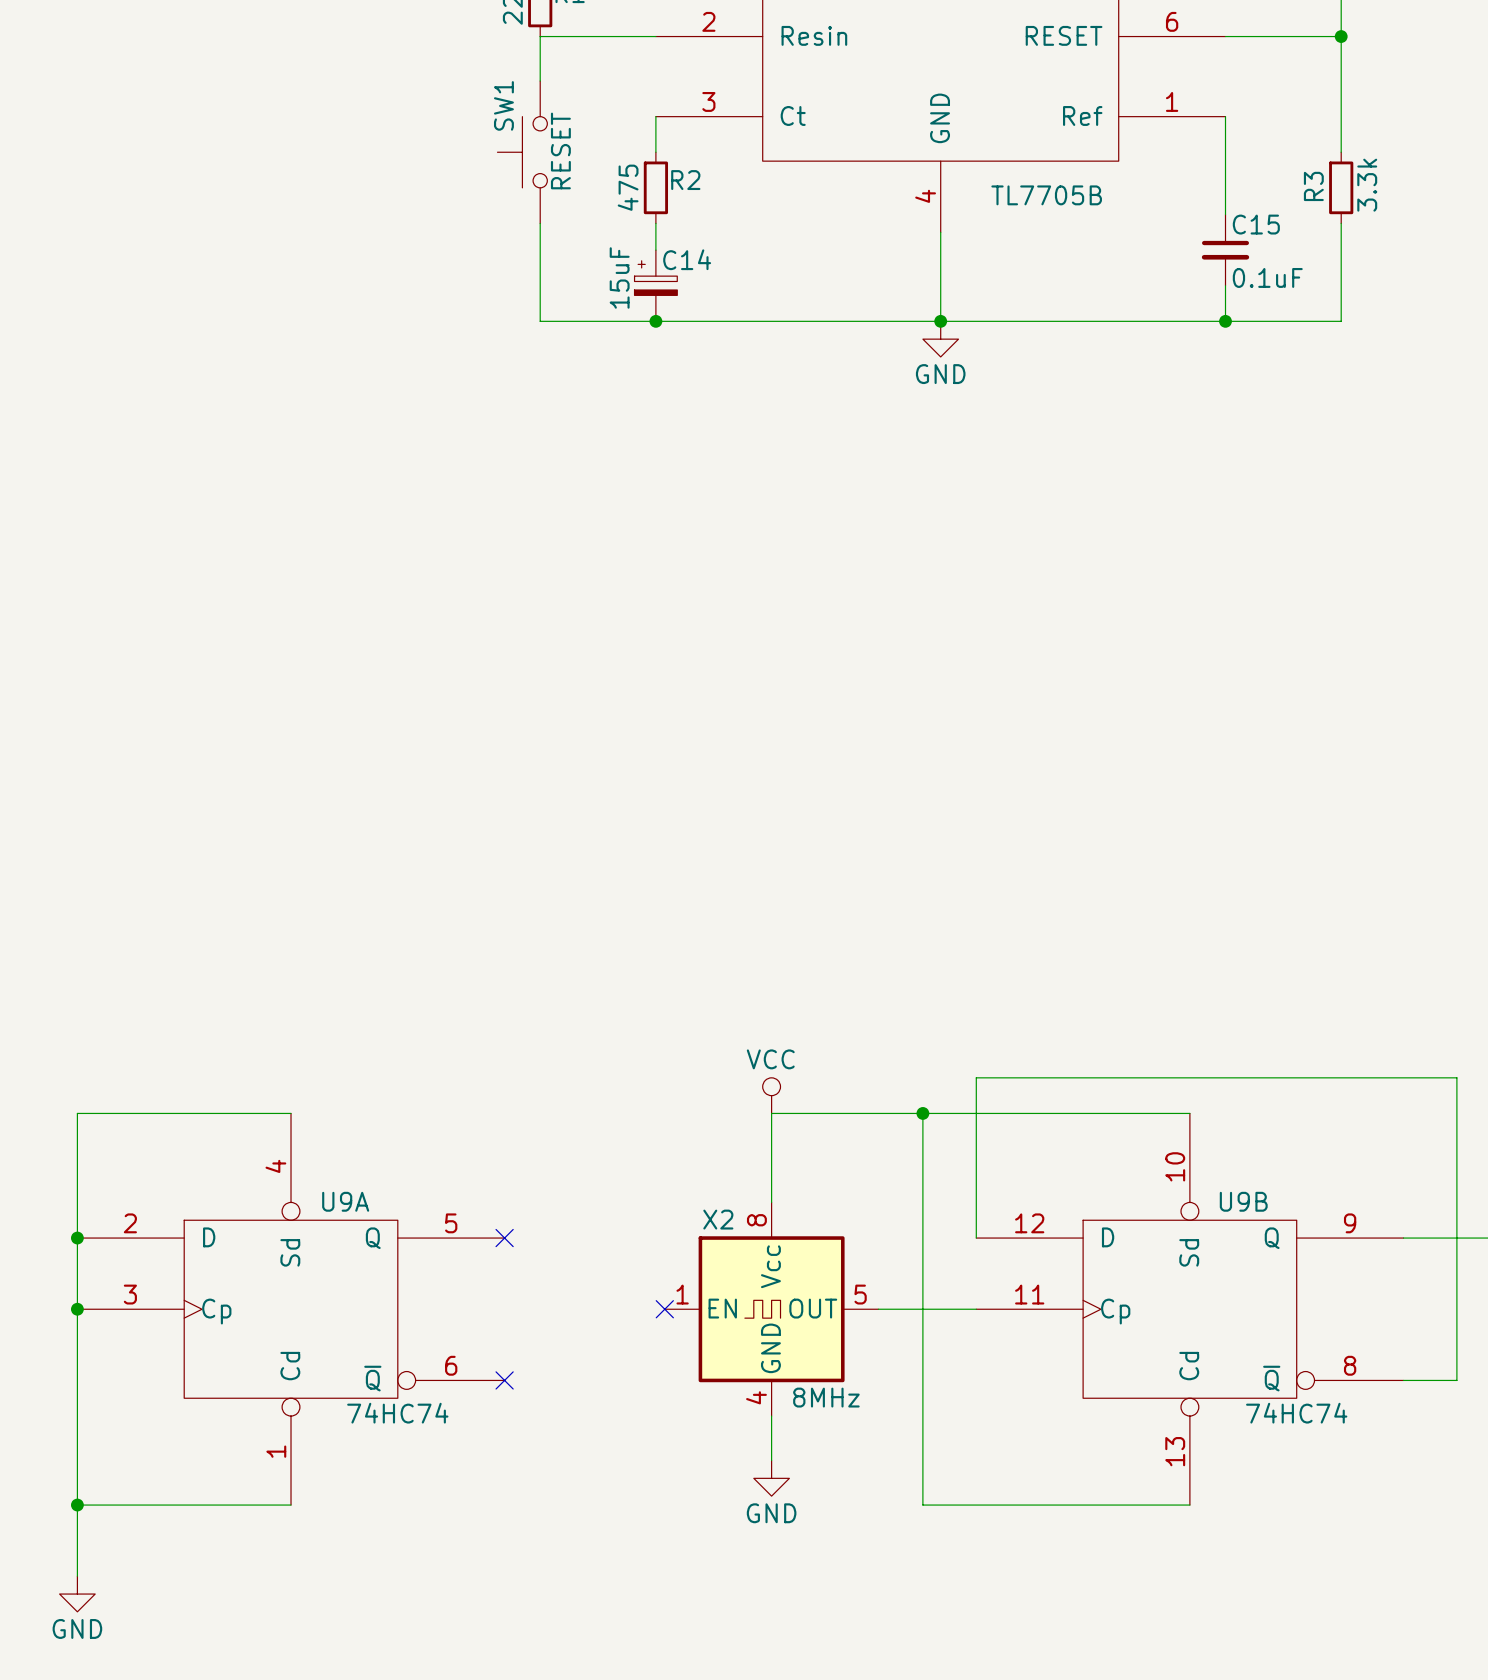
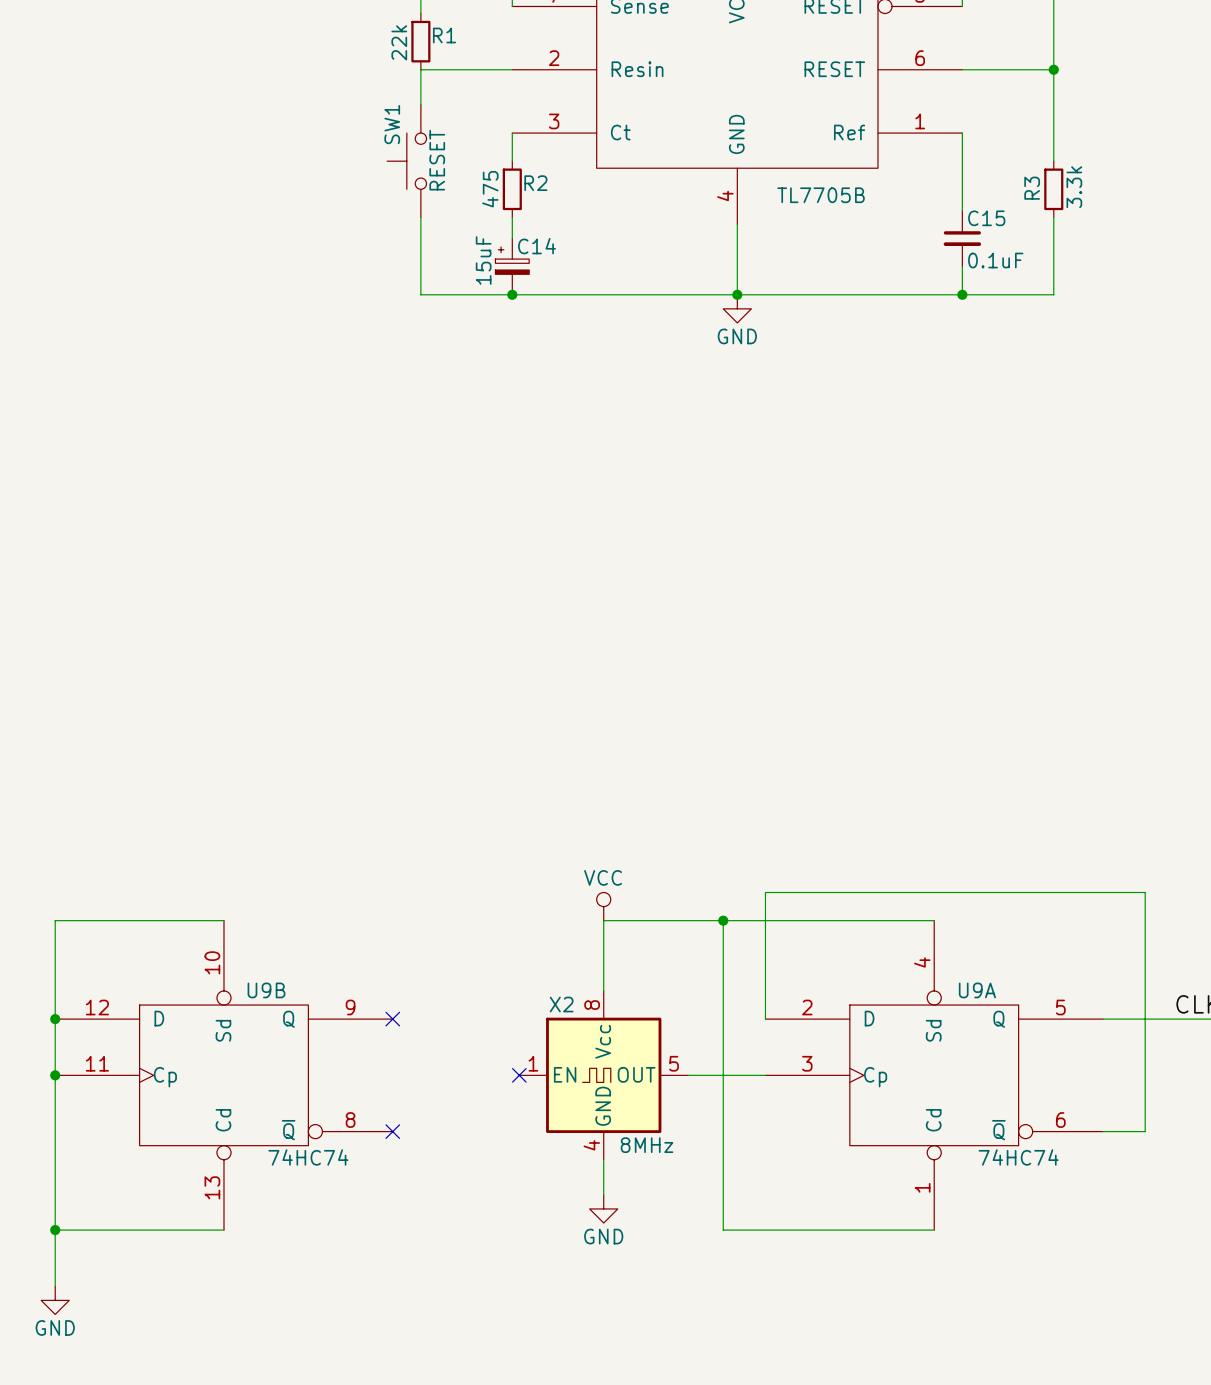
U9A position: (291, 1309) -> (934, 1075)
U9B position: (1189, 1309) -> (223, 1075)

